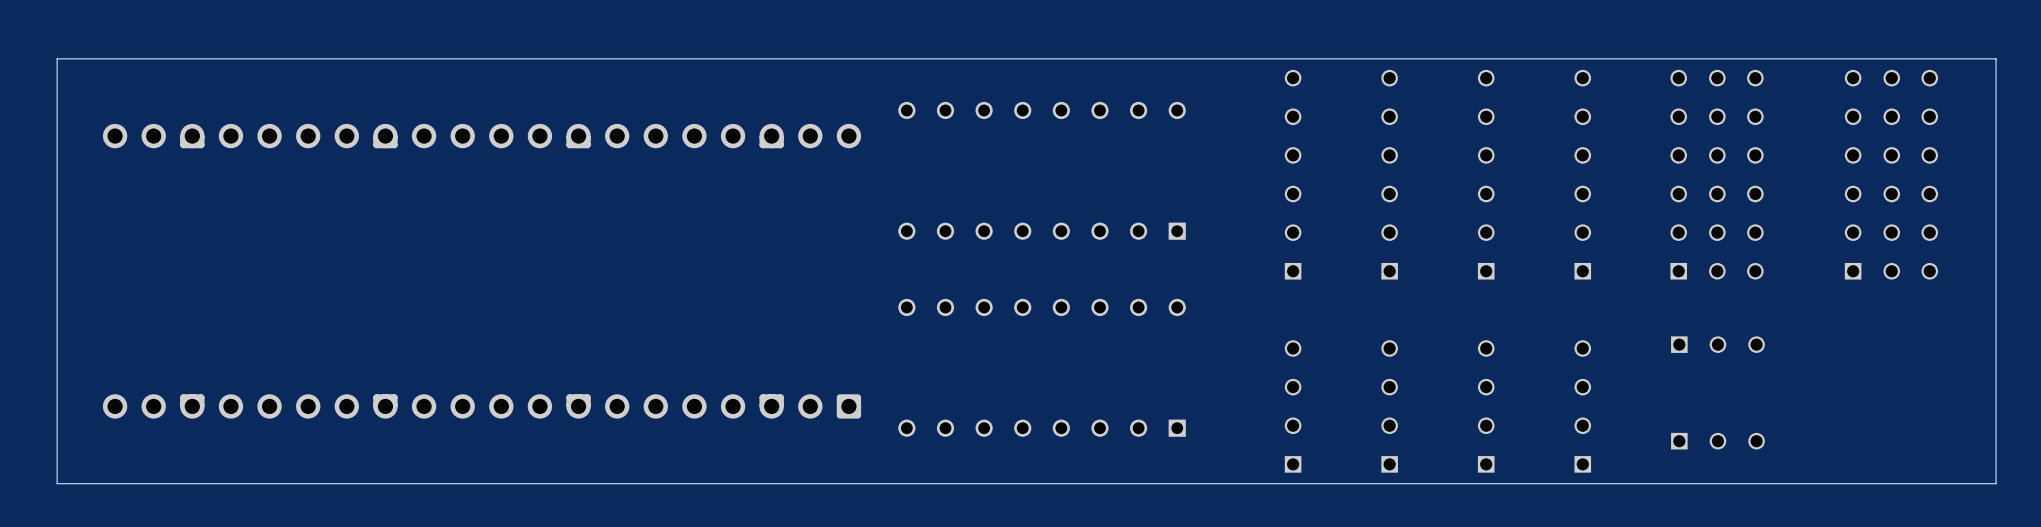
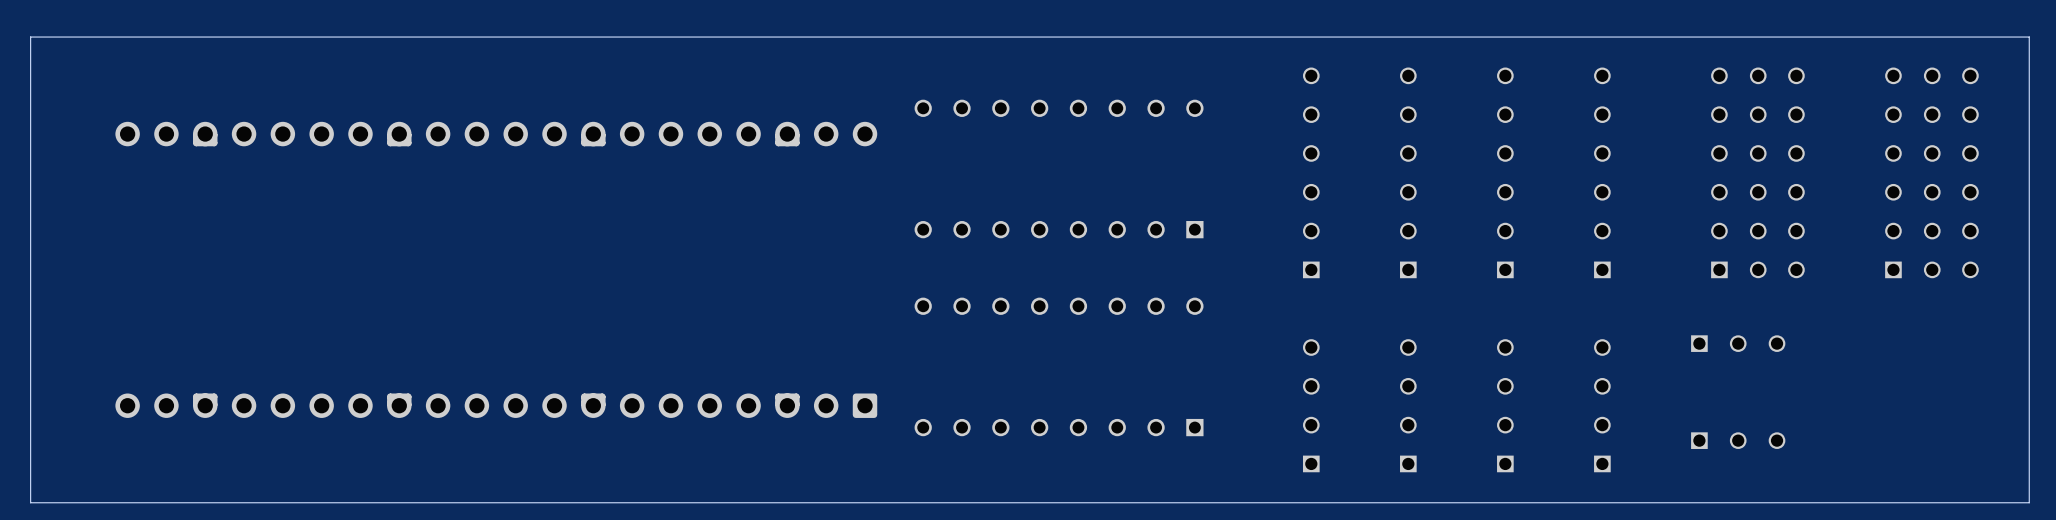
board edge: (1996, 58) (57, 58) (57, 483) (1996, 483) (1996, 58) -> (2029, 37) (2029, 502) (30, 502) (30, 37) (2029, 37)
part position: (1717, 174) -> (1757, 172)
part position: (1891, 174) -> (1931, 172)

